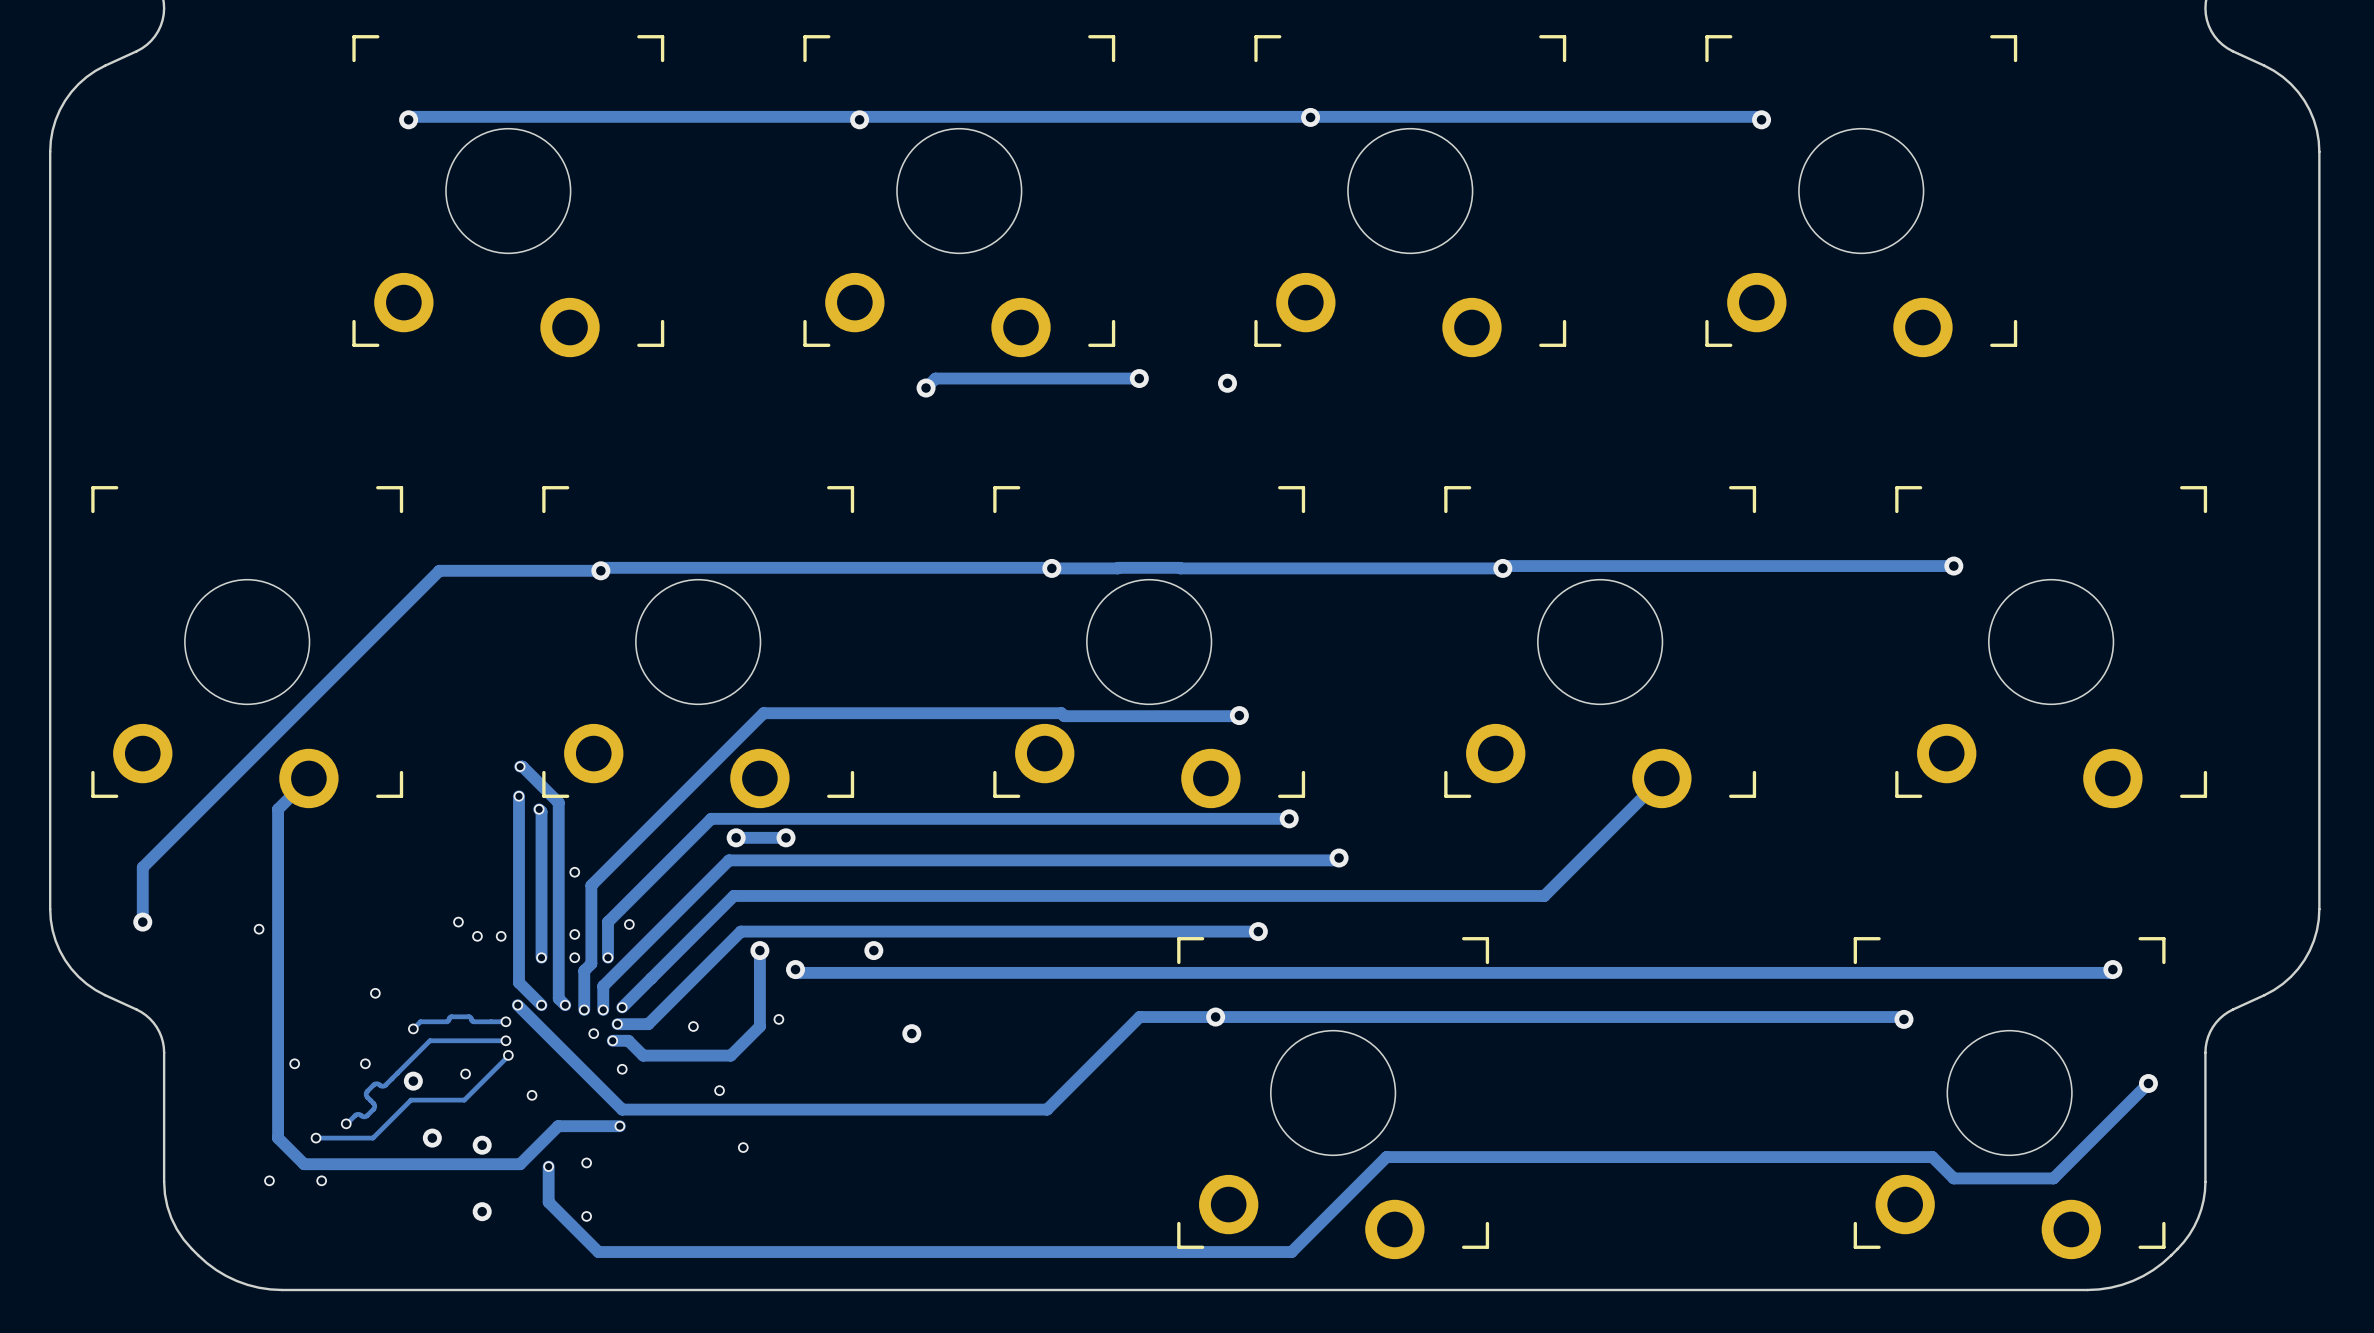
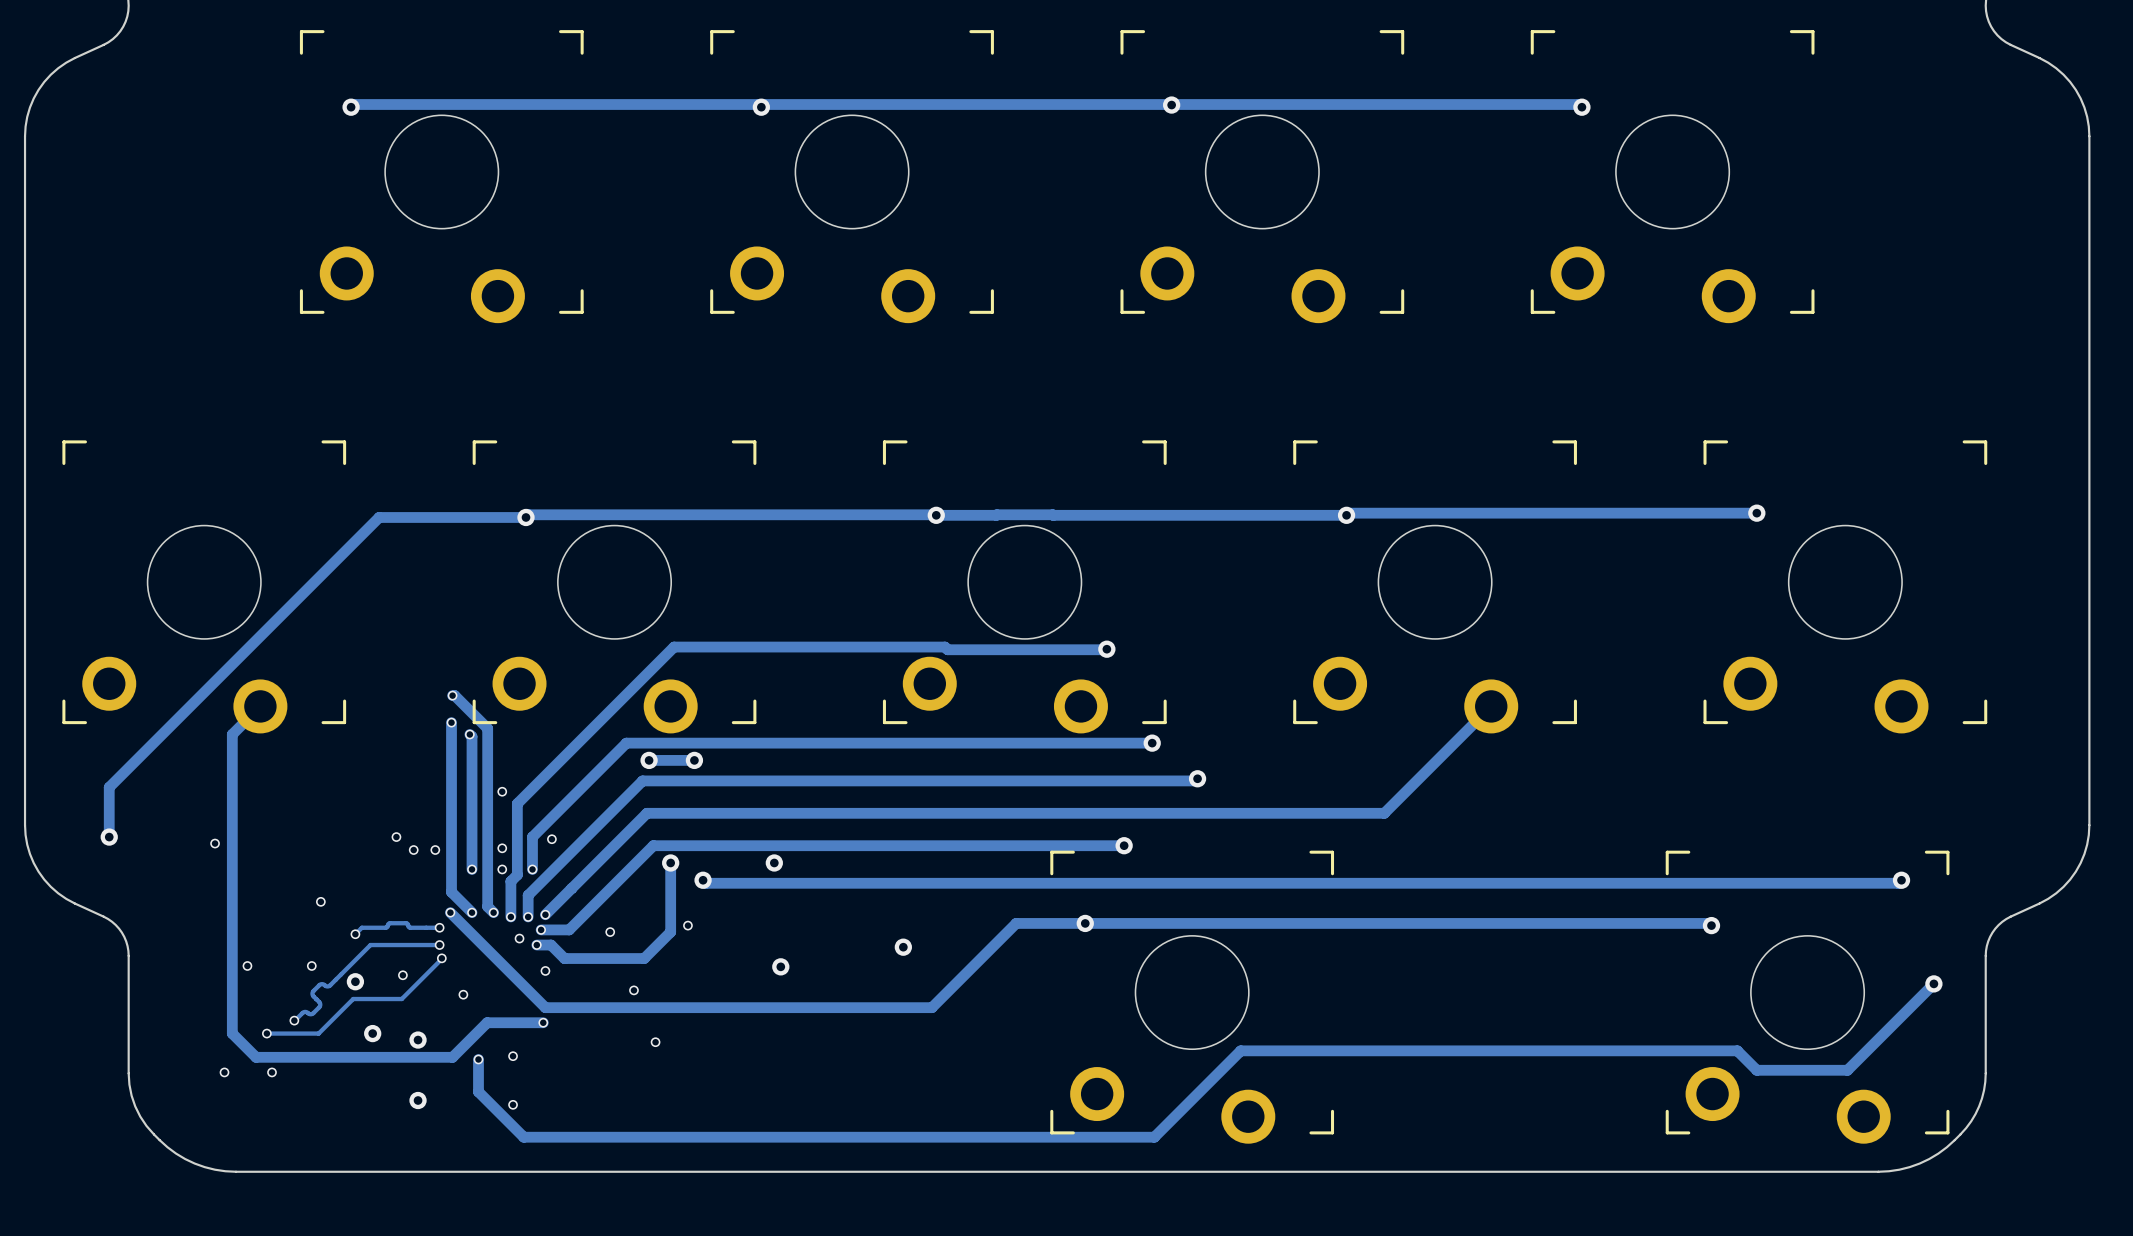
track: (1139, 378) (935, 378) (926, 388) -> none
via: (1139, 378) -> none
via: (1227, 383) -> none
via: (926, 388) -> none
via position: (911, 1033) -> (780, 966)
via: none -> (903, 947)

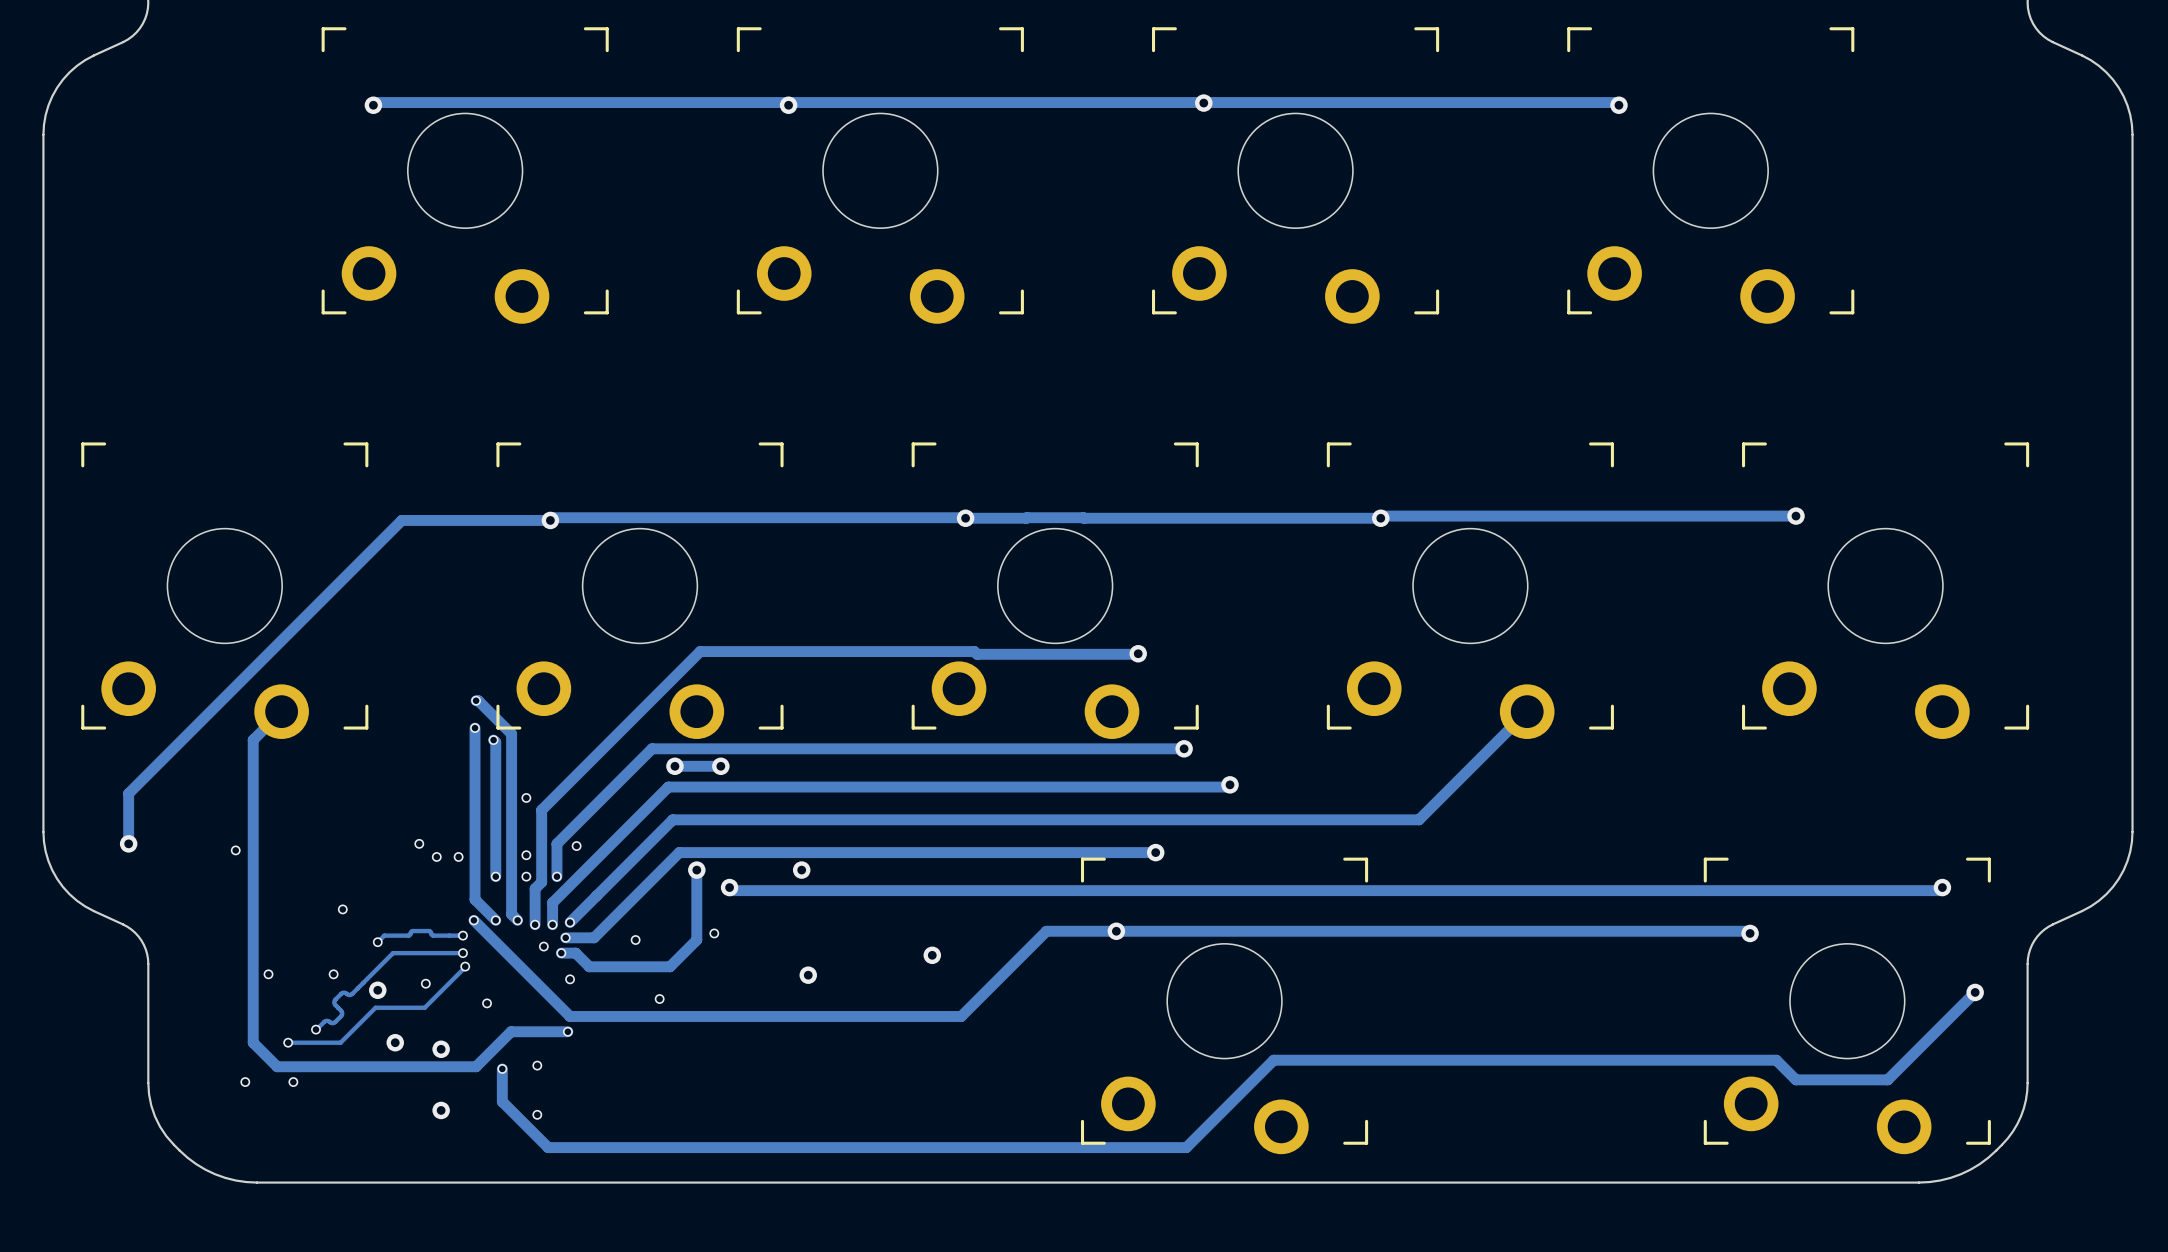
via: (655, 1042) -> none

